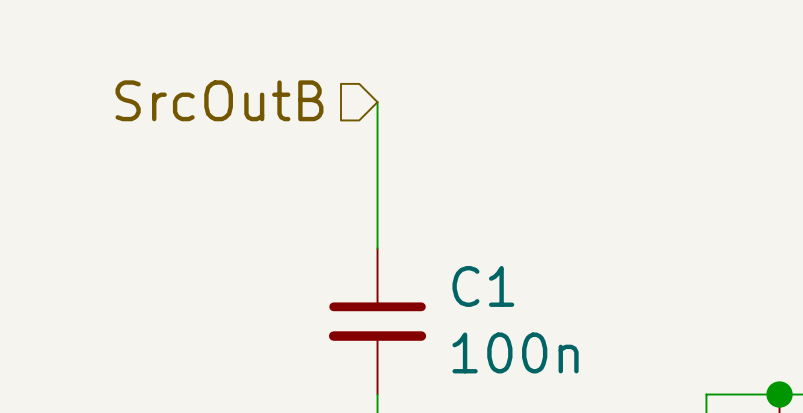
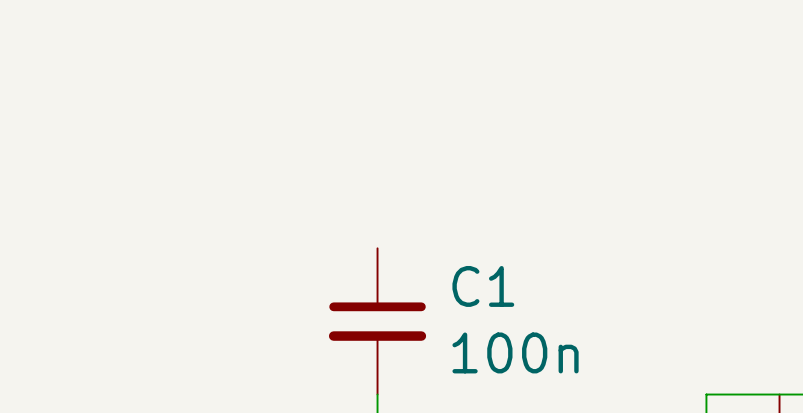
hierarchical label: SrcOutB (219, 100) -> none
wire: (377, 102) (377, 248) -> none
junction: (779, 394) -> none

